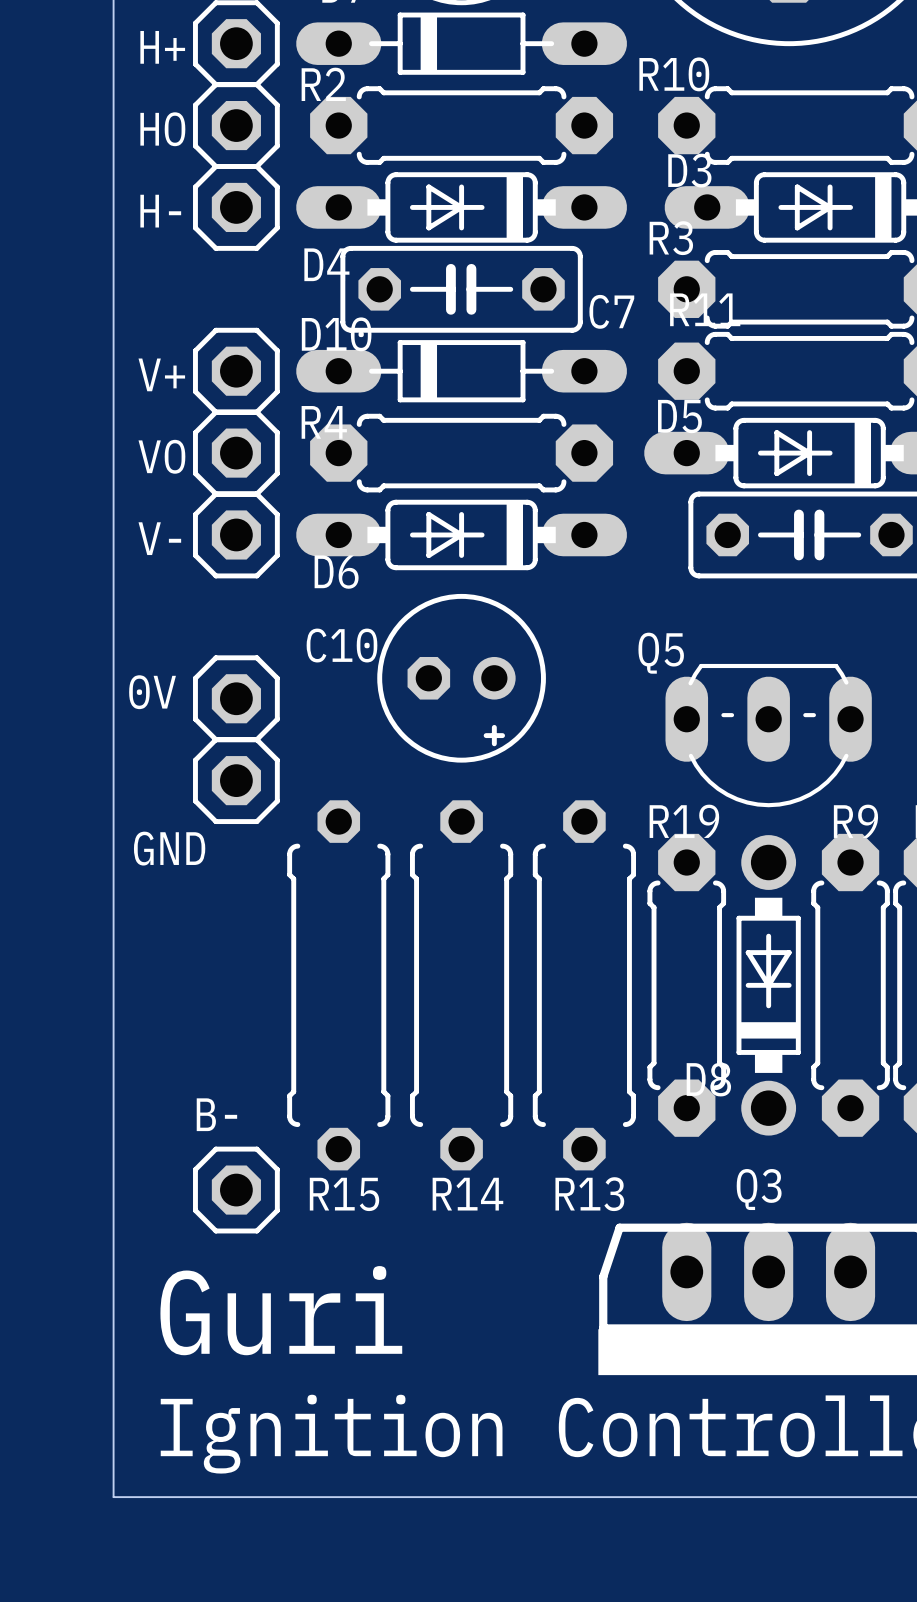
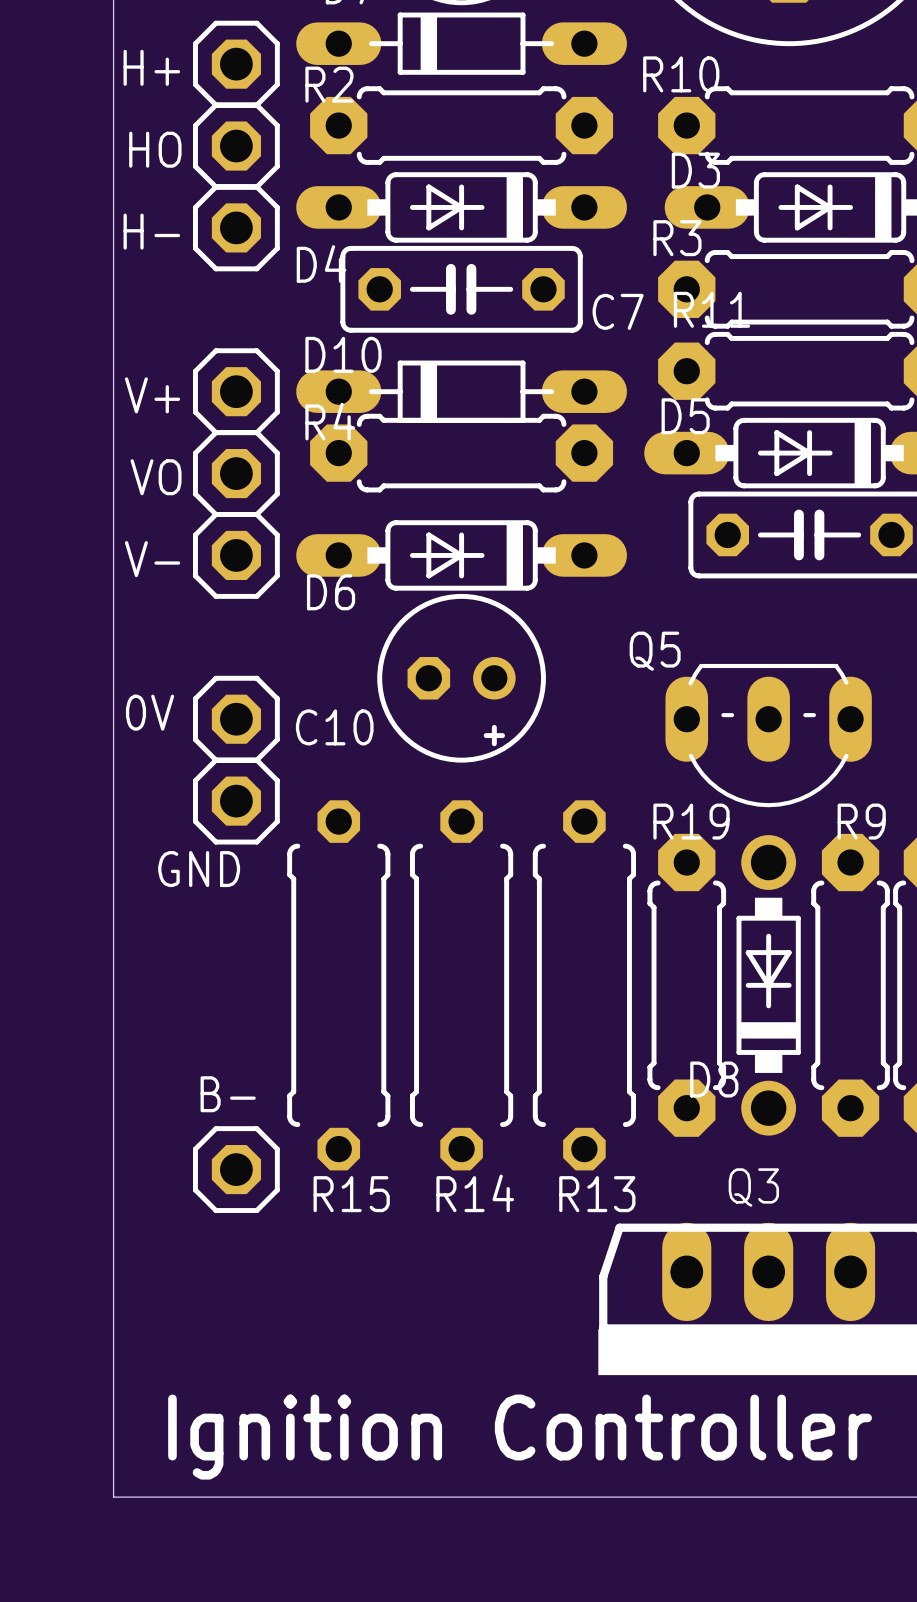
H+ position: (236, 43) -> (236, 64)
HO position: (236, 125) -> (236, 146)
H- position: (236, 207) -> (236, 227)
V+ position: (236, 371) -> (236, 391)
D10 position: (461, 371) -> (461, 391)
VO position: (236, 453) -> (236, 473)
V- position: (236, 534) -> (236, 555)
D6 position: (461, 534) -> (461, 555)
C10 name position: C10 (341, 645) -> C10 (334, 727)
0V position: (236, 698) -> (236, 719)
GND position: (236, 780) -> (236, 801)
GND name position: GND (169, 848) -> GND (199, 869)
B- position: (236, 1190) -> (236, 1169)
text: Guri (281, 1310) -> none

